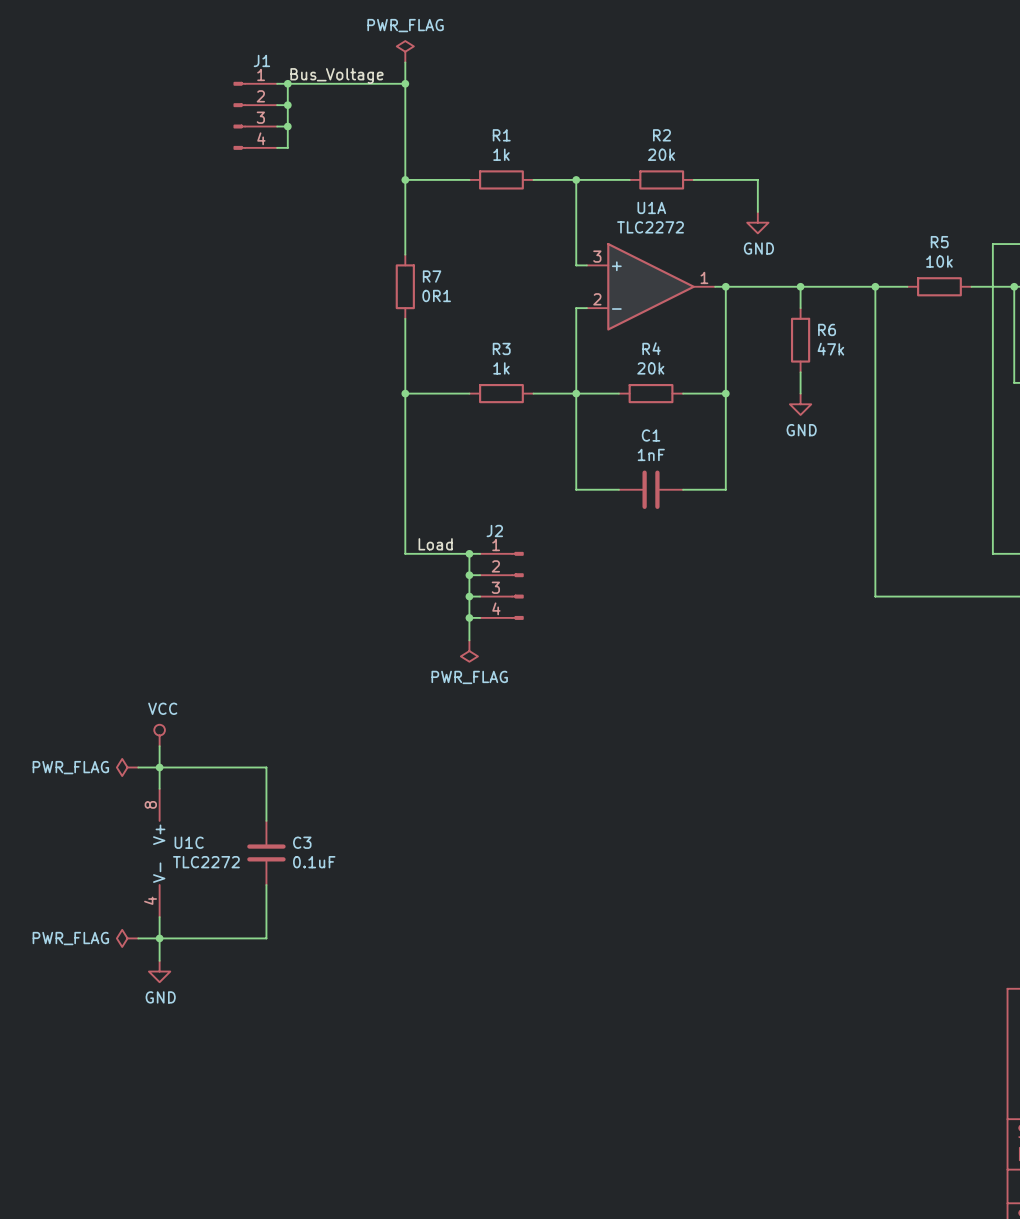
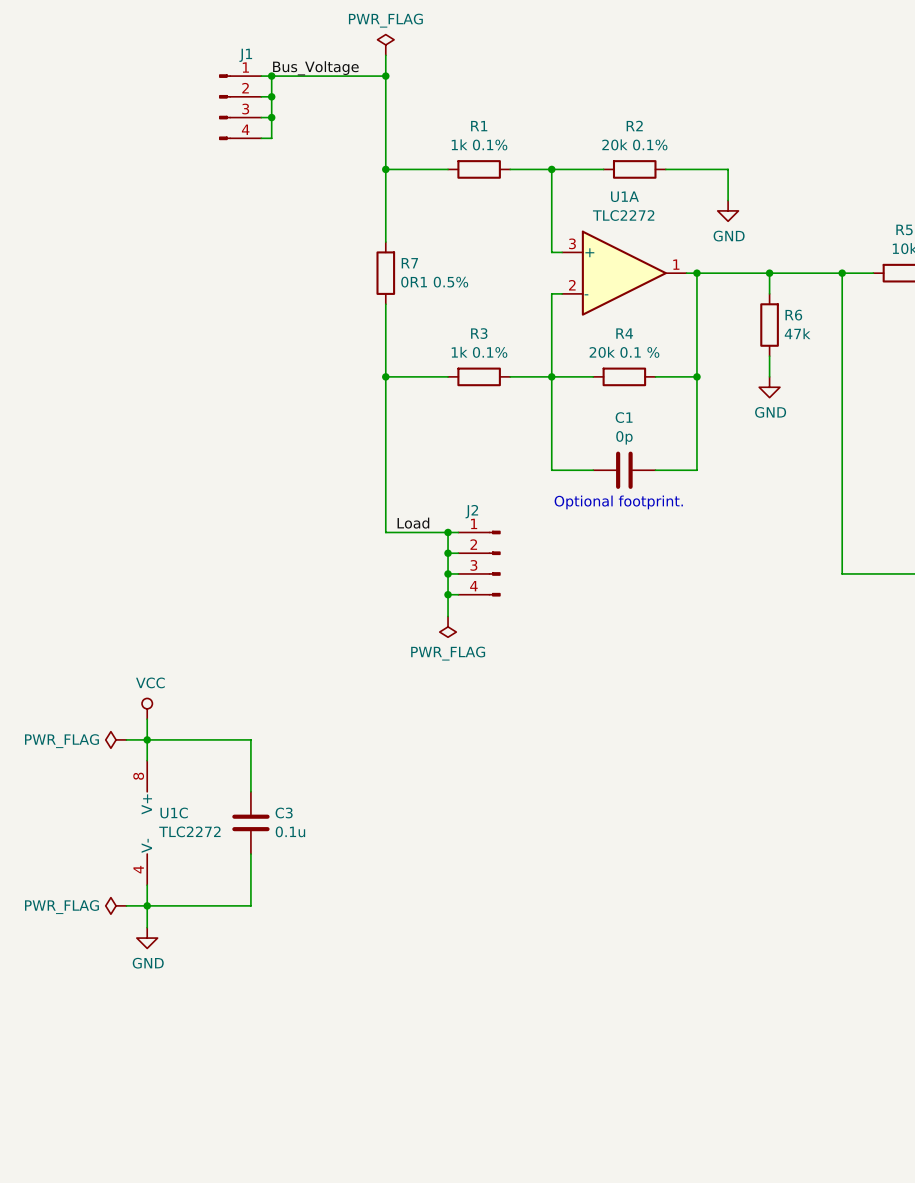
R1 value: 1k (501, 154) -> 1k 0.1% (479, 144)
R2 value: 20k (661, 154) -> 20k 0.1% (634, 144)
R7 value: 0R1 (436, 295) -> 0R1 0.5% (434, 282)
R3 value: 1k (501, 368) -> 1k 0.1% (479, 352)
R4 value: 20k (650, 368) -> 20k 0.1 % (624, 352)
C1 value: 1nF (651, 454) -> 0p (624, 437)
text: none -> Optional footprint. (618, 502)
C3 value: 0.1uF (314, 862) -> 0.1u (290, 831)

